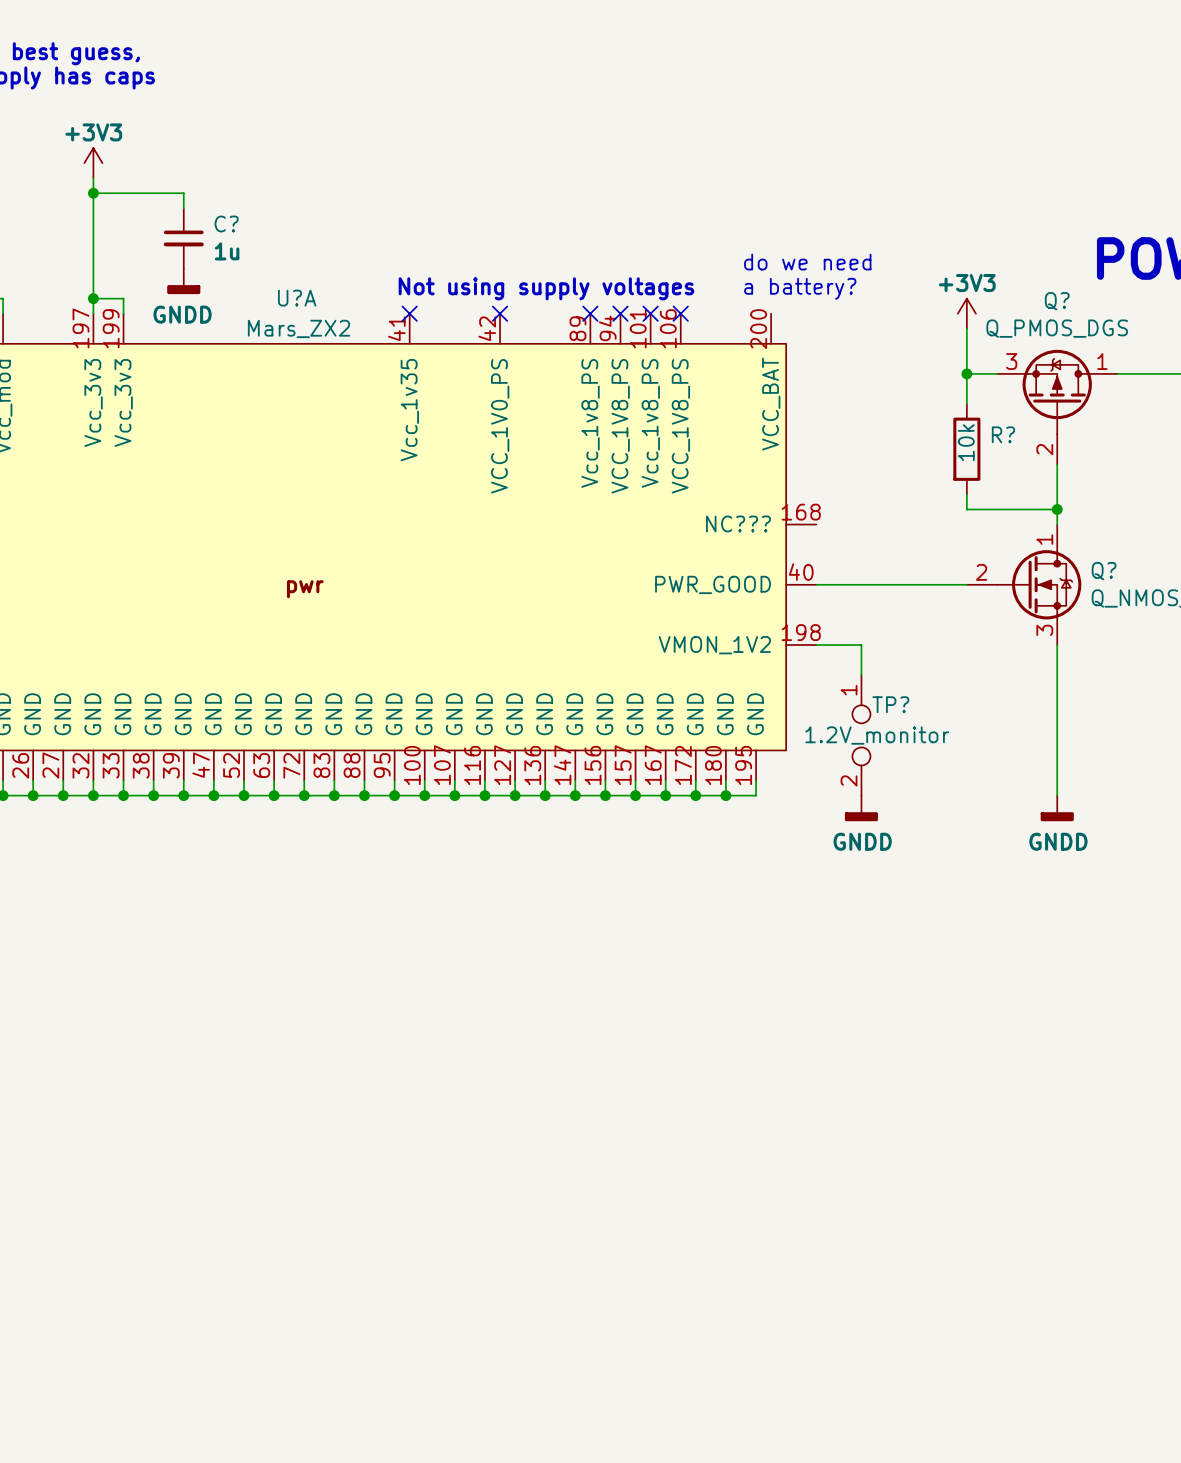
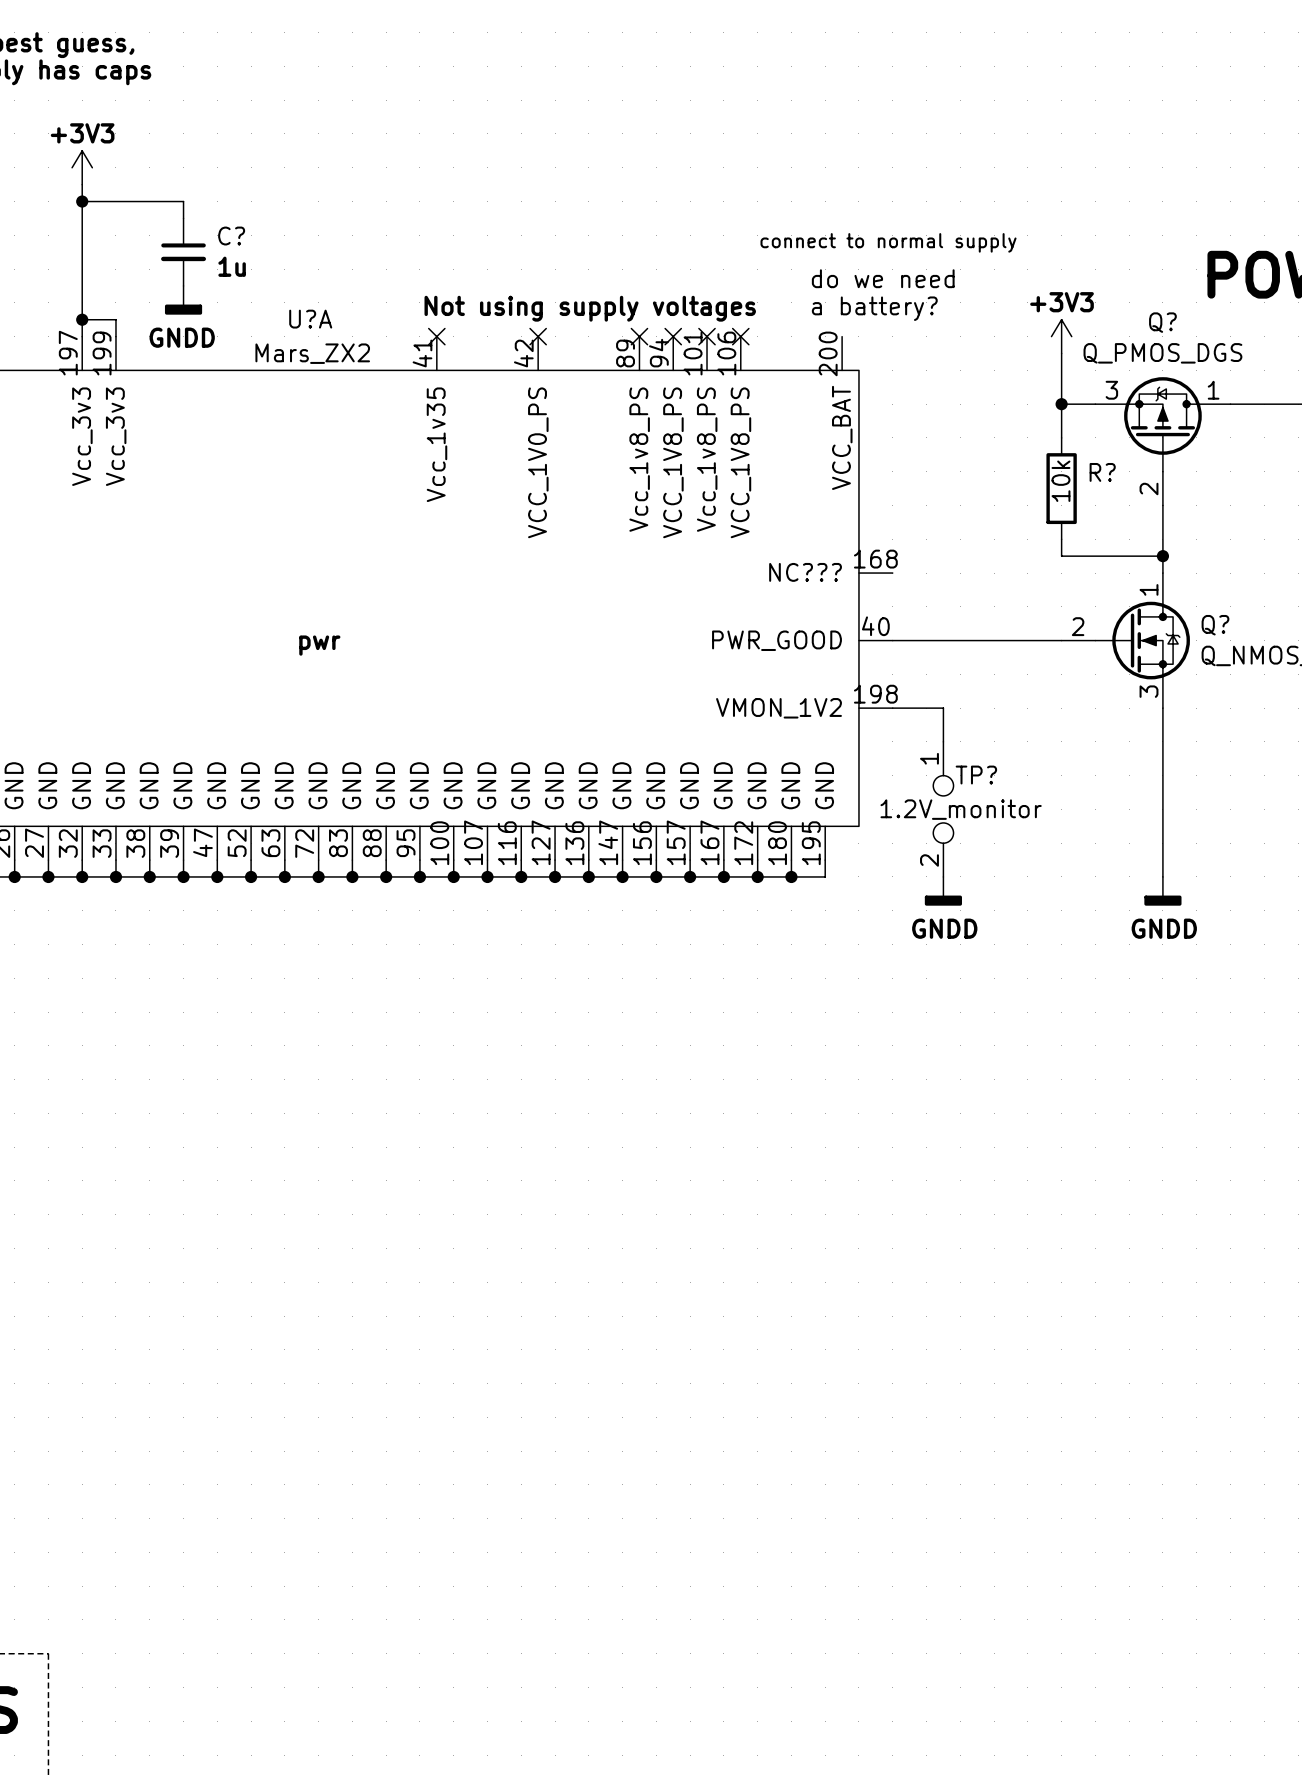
text: none -> connect to normal supply (888, 242)

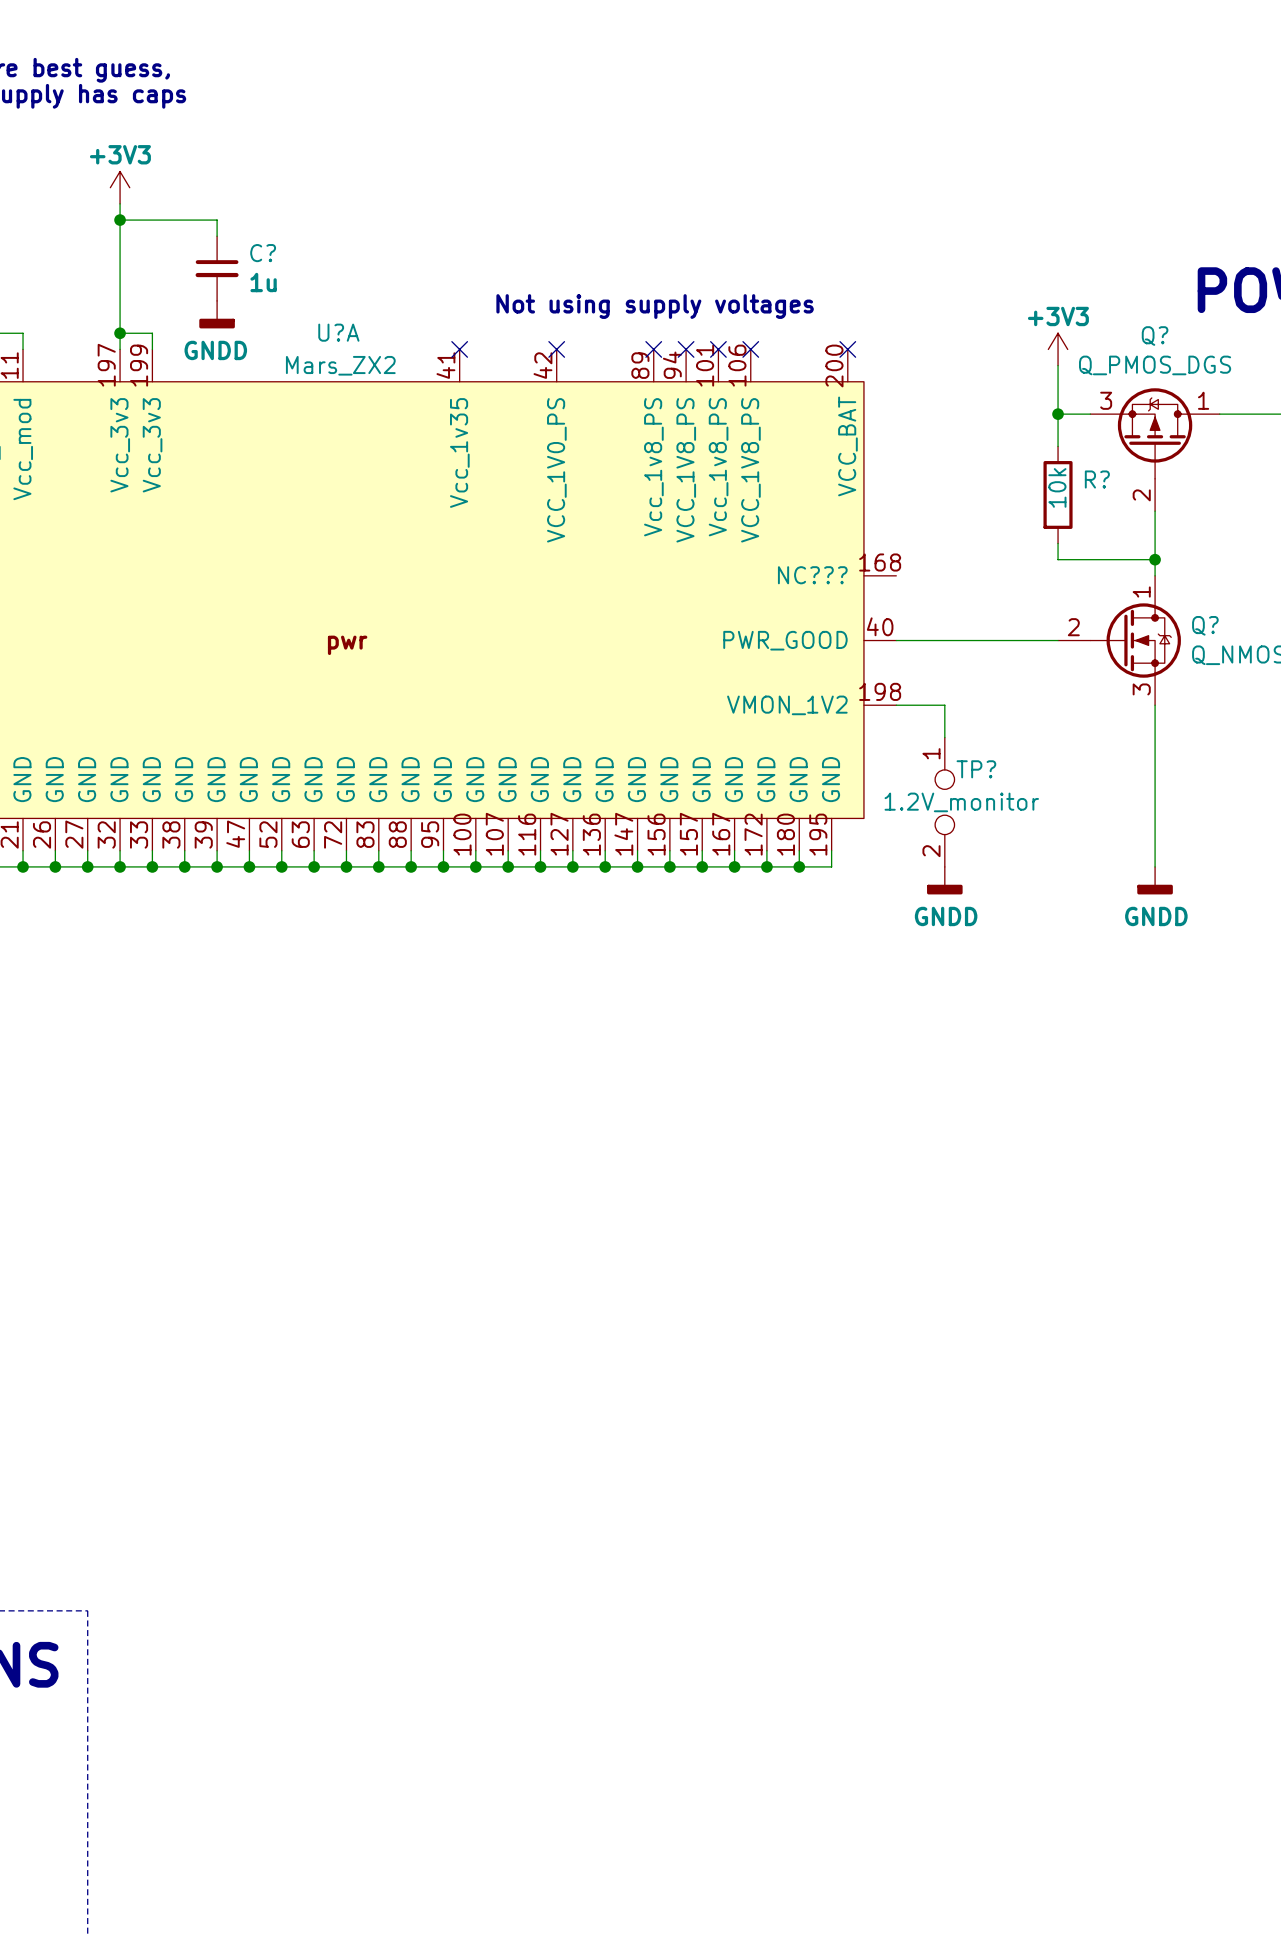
text: connect to normal supply (888, 242) -> none
text: do we need (883, 278) -> none
text position: Not using supply voltages (590, 308) -> Not using supply voltages (655, 306)
text: a battery? (874, 308) -> none
no-connect mark: none -> (847, 349)

